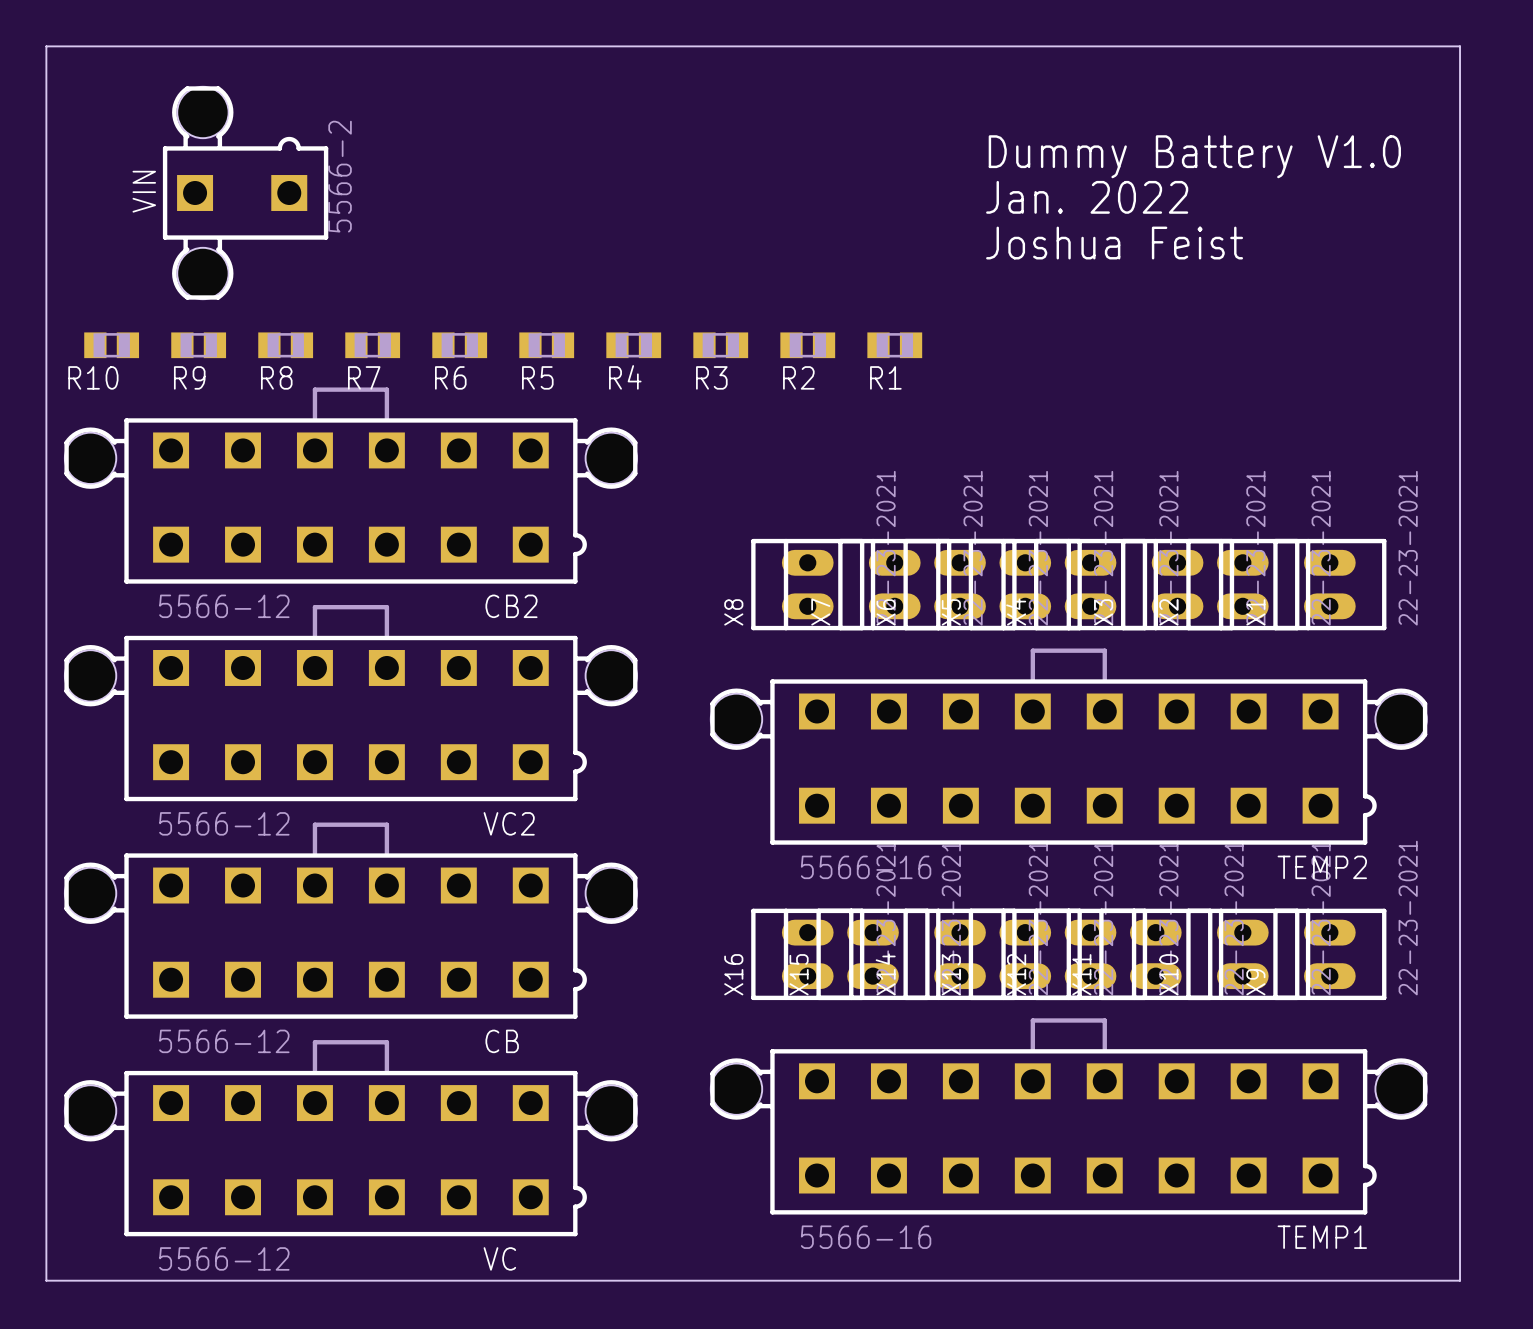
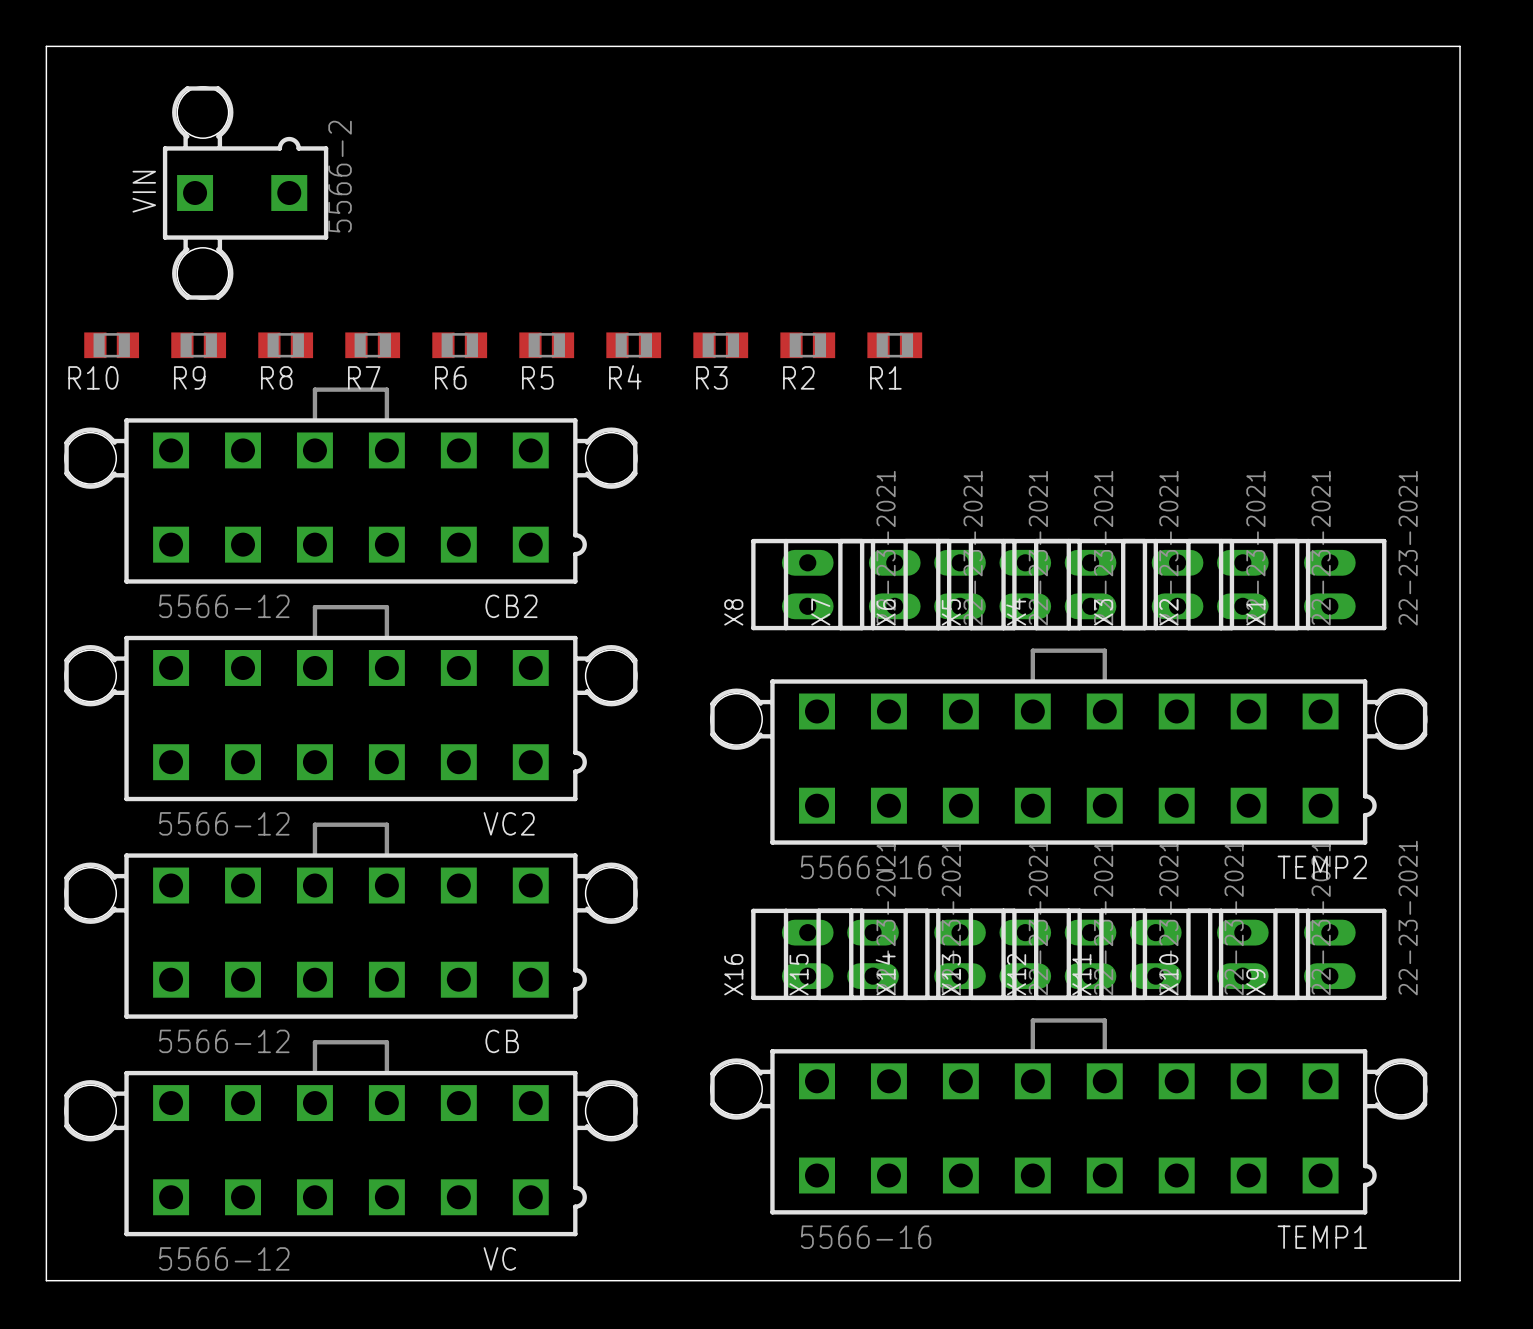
text: Dummy Battery V1.0 (1194, 156) -> none
text: Jan. 2022 (1087, 197) -> none
text: Joshua Feist (1114, 243) -> none

